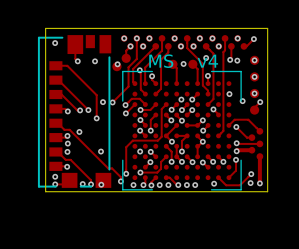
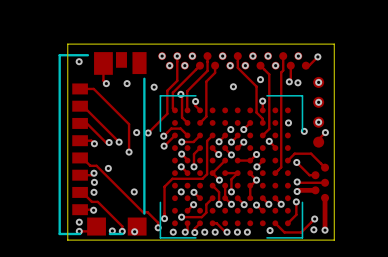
track: (130, 46) (126, 50) (126, 58) -> none
part: (126, 58) -> none
text: MS v4 (183, 61) -> none
track: (172, 64) (176, 68) (176, 83) -> none
part: (172, 64) -> none
track: (192, 64) (197, 69) (197, 83) -> none
part: (192, 64) -> none
part: (116, 66) -> none

